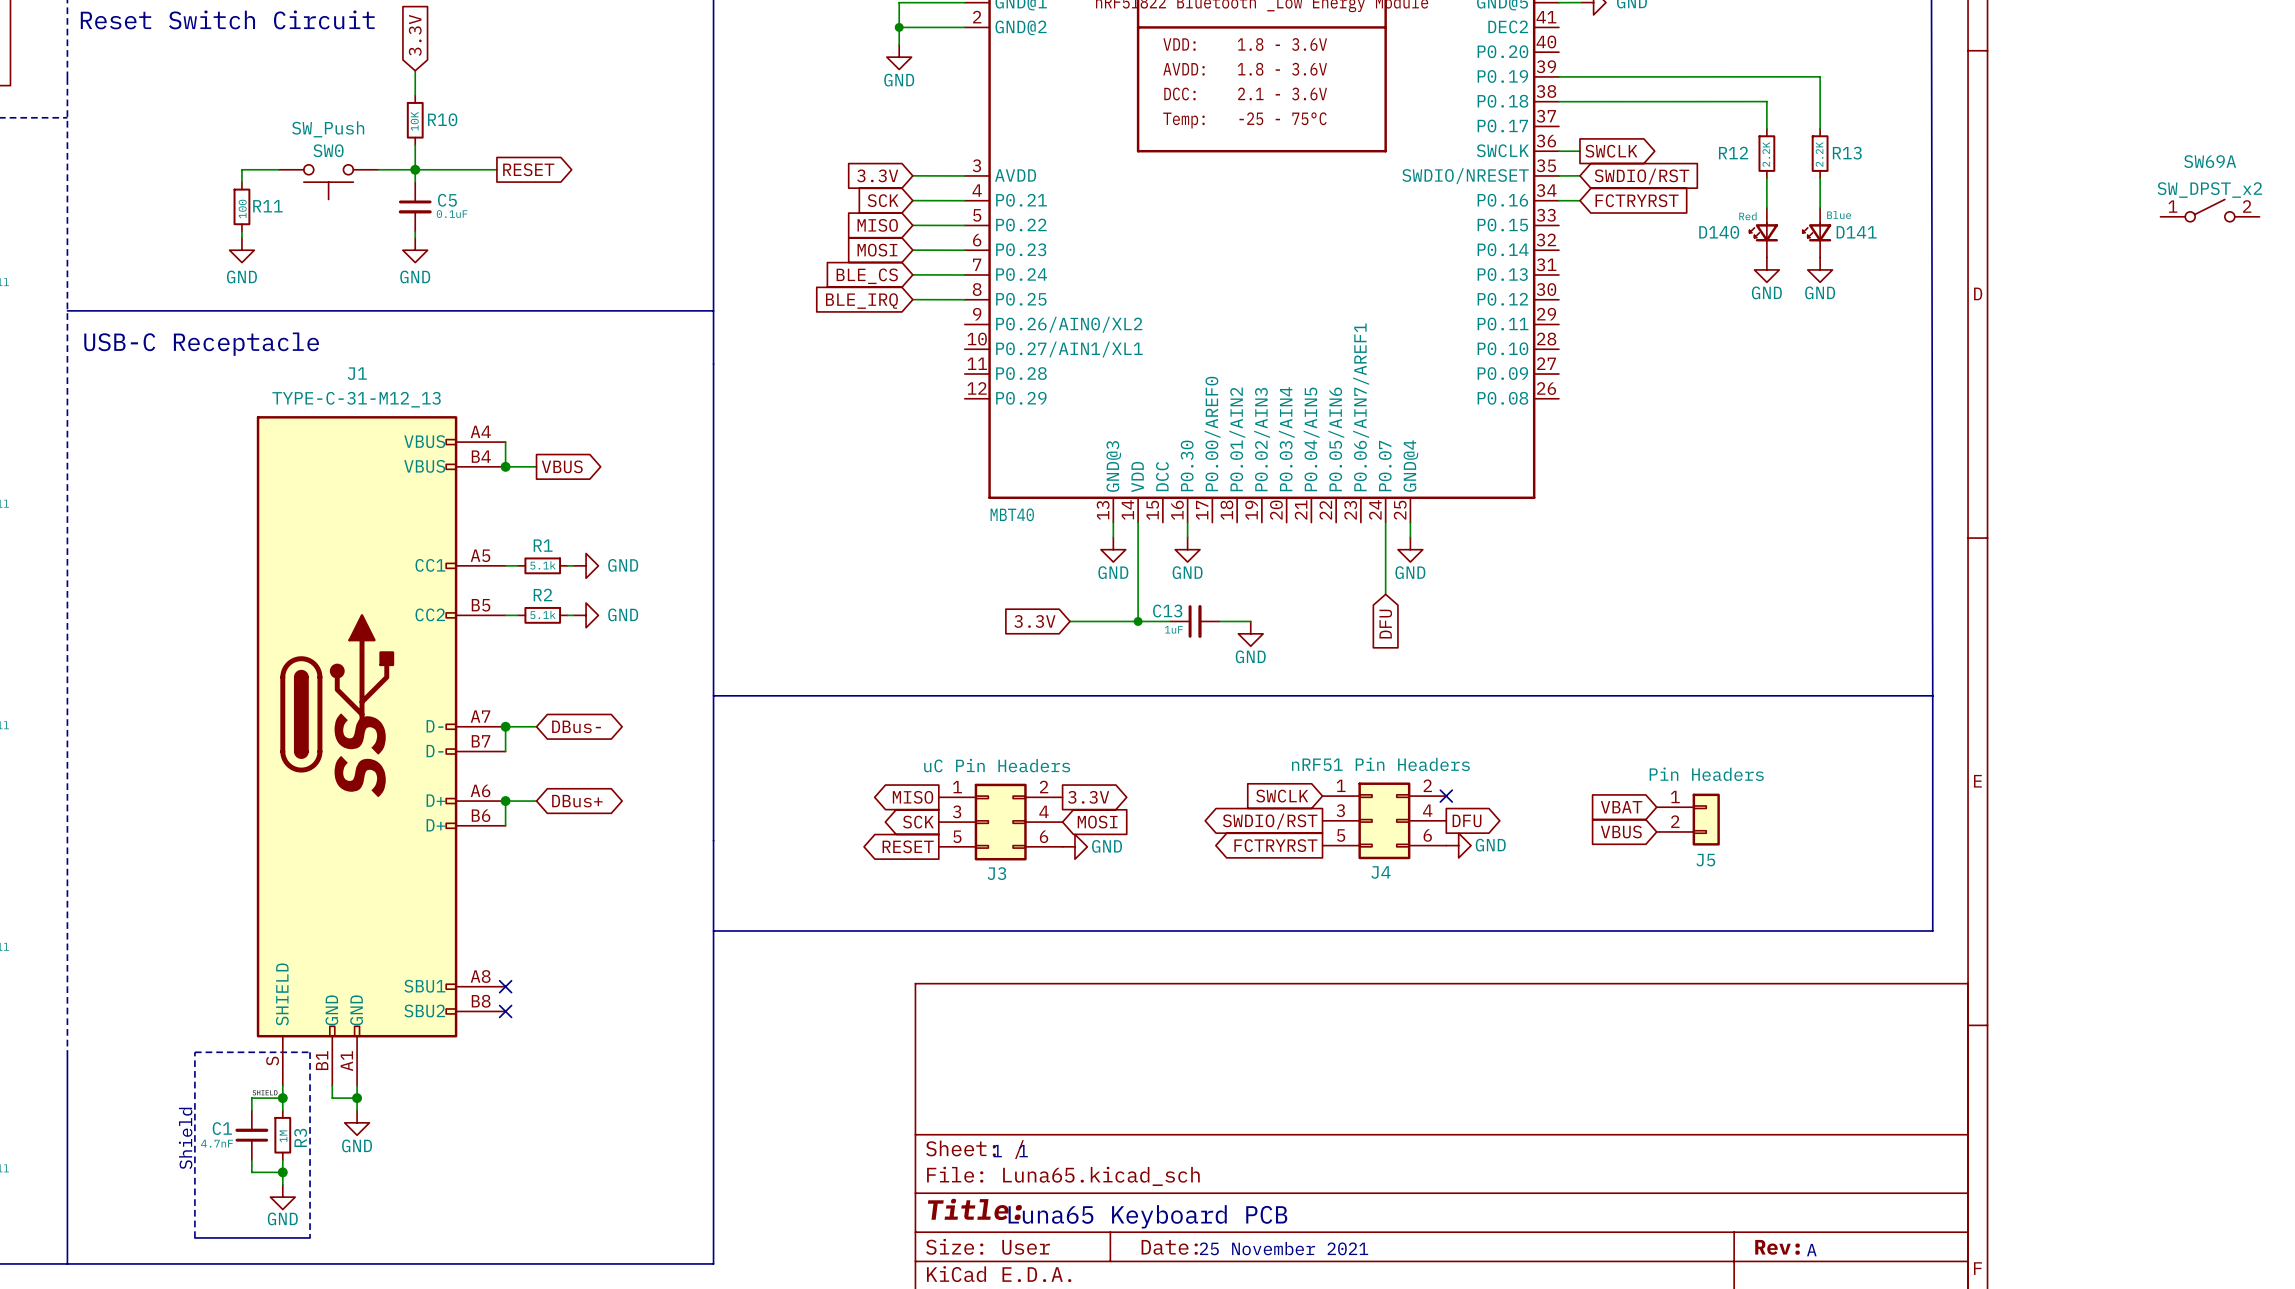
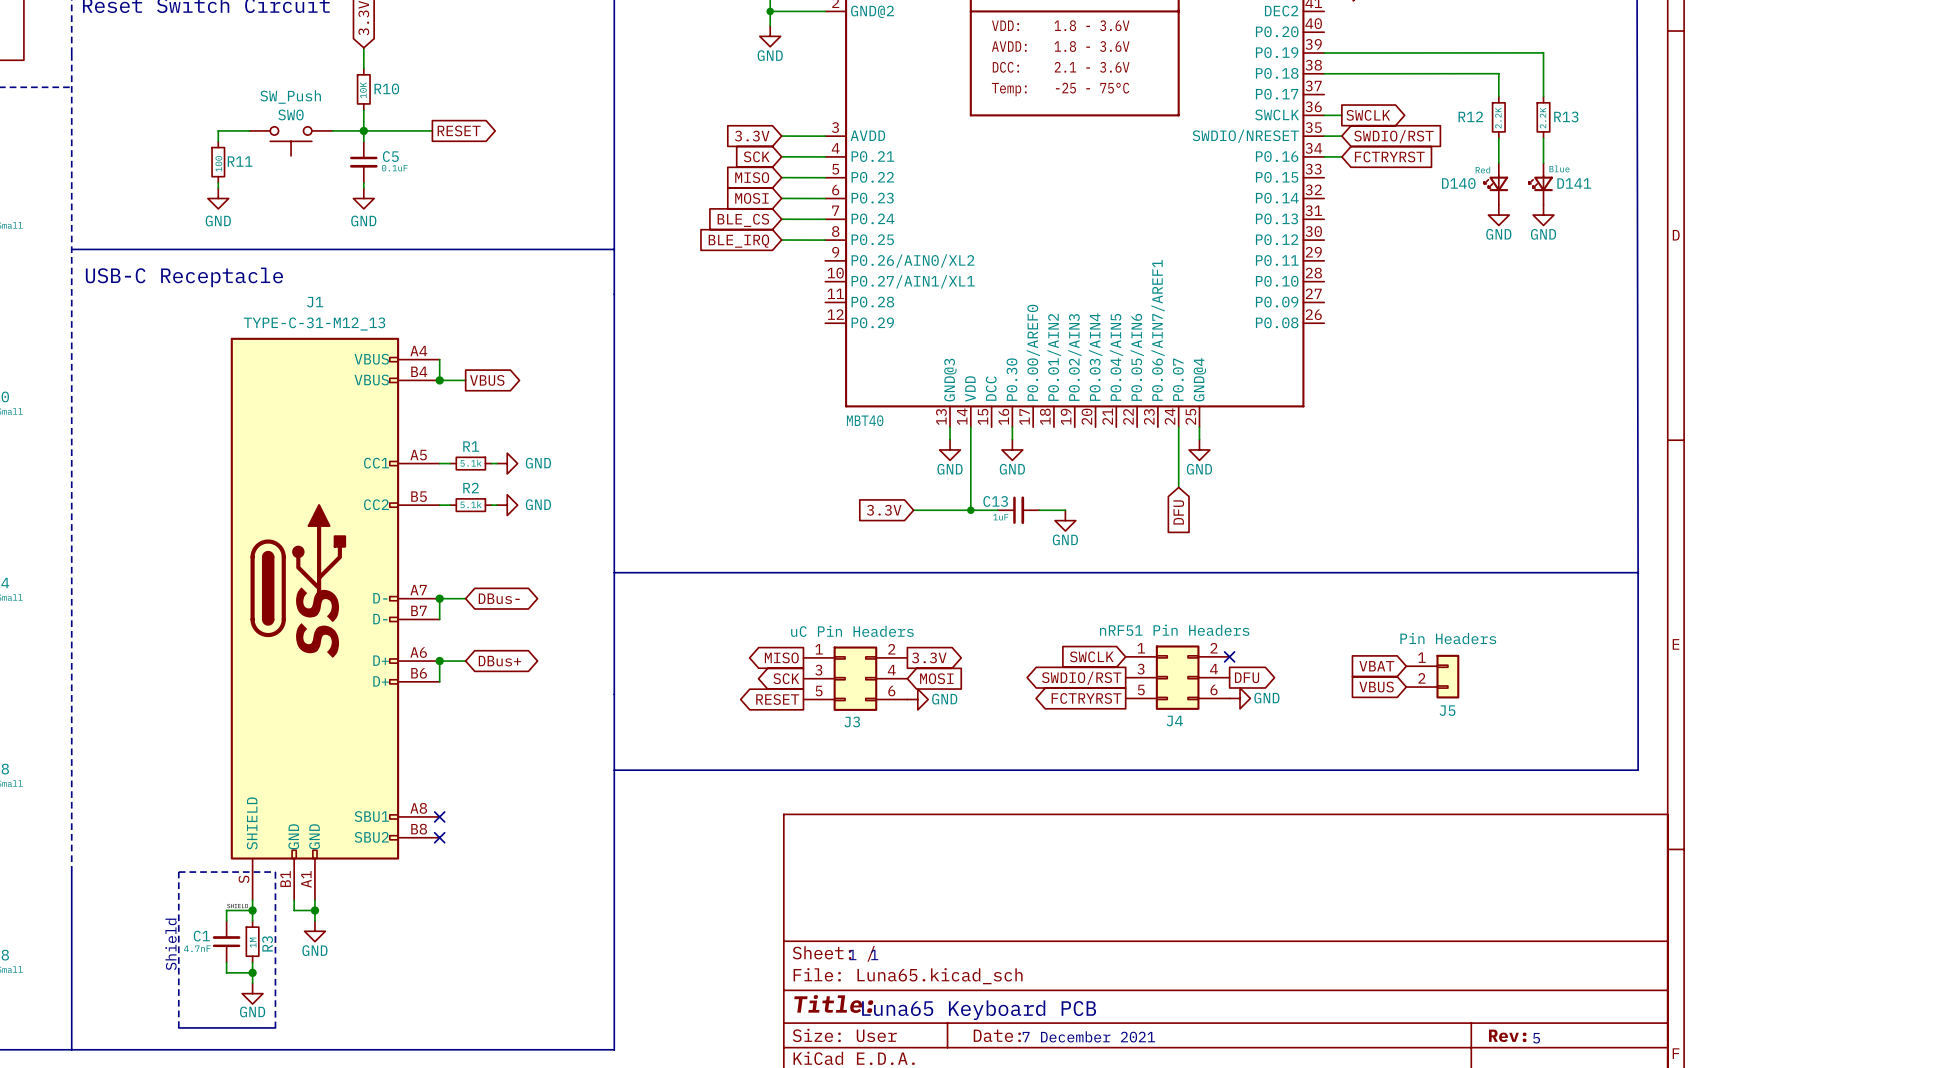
SW69A: SW_DPST_x2 (2210, 210) -> none
text: 25 November 2021 (1284, 1248) -> 7 December 2021 (1088, 1036)
text: A (1811, 1250) -> 5 (1536, 1038)

